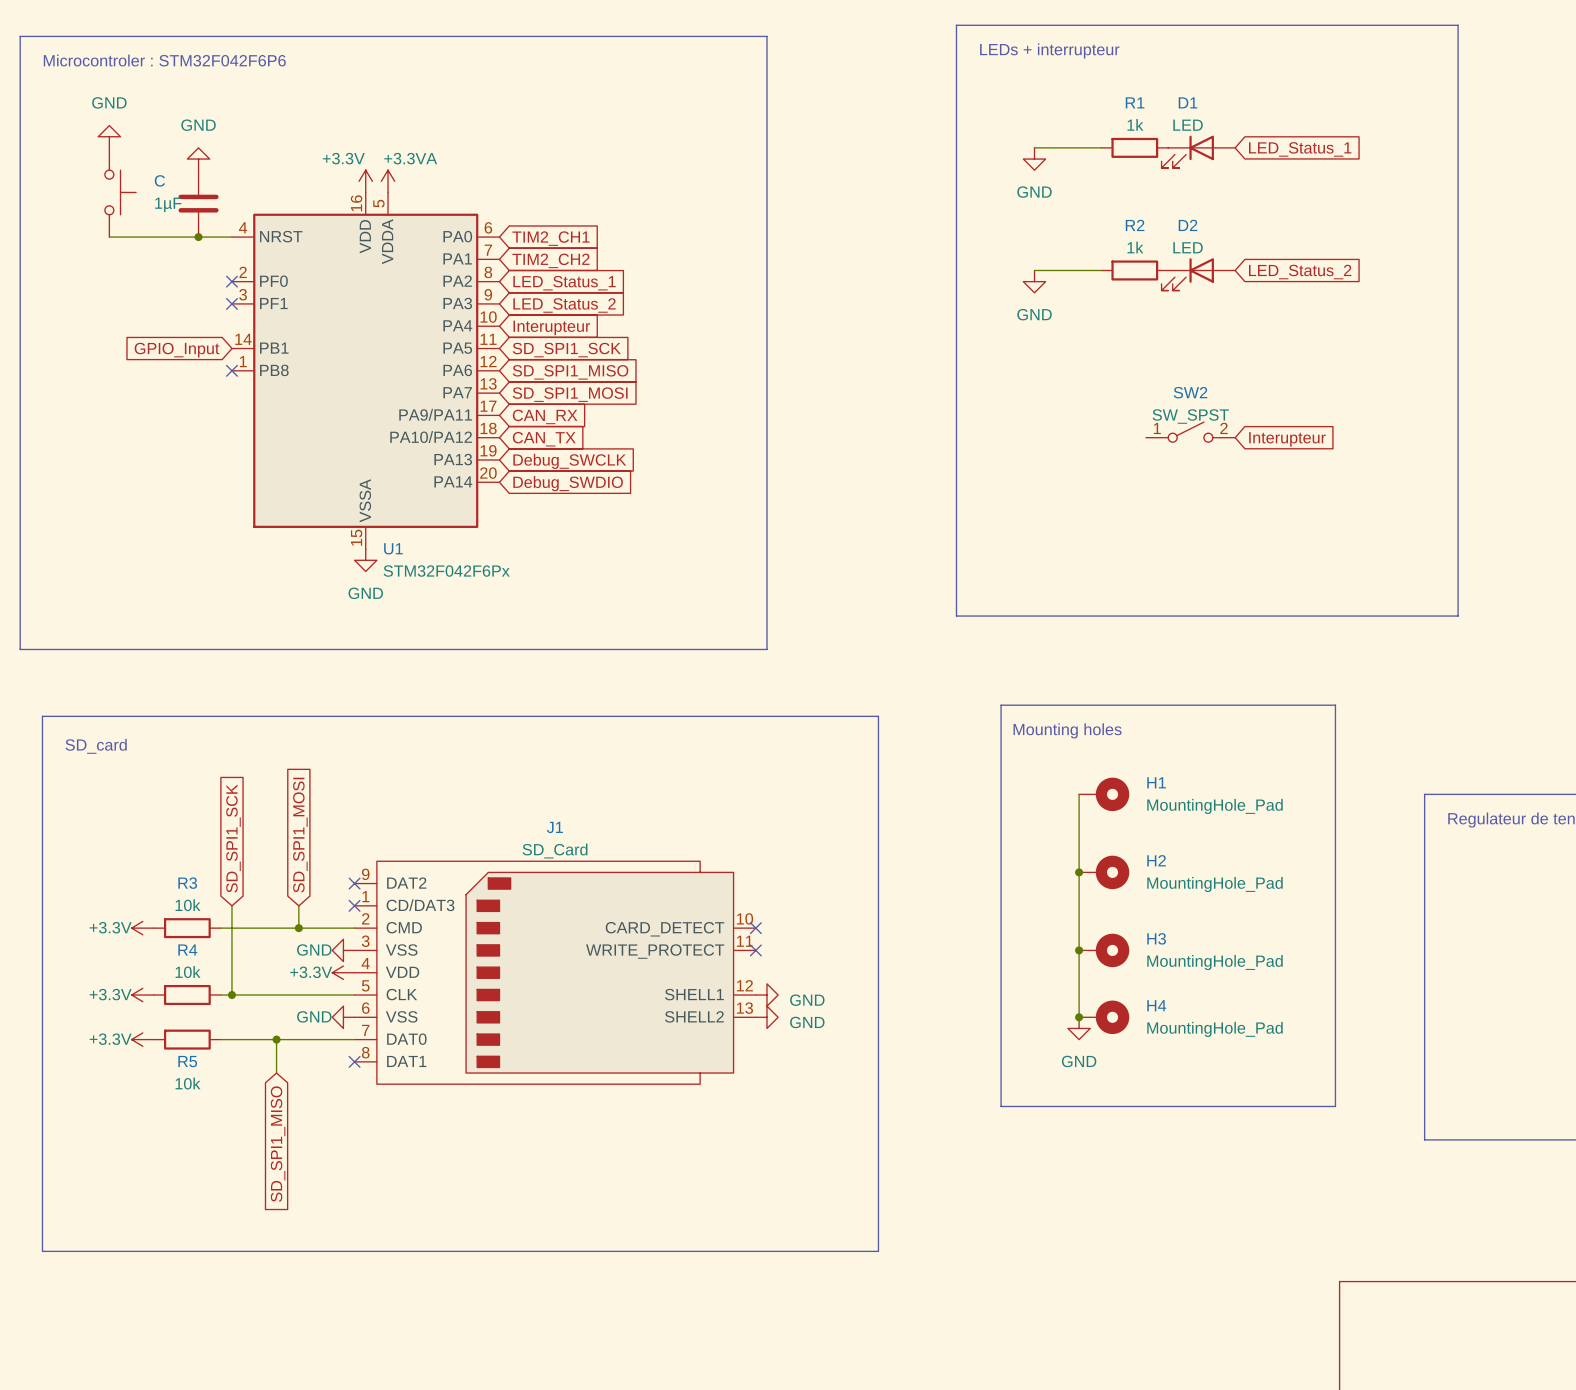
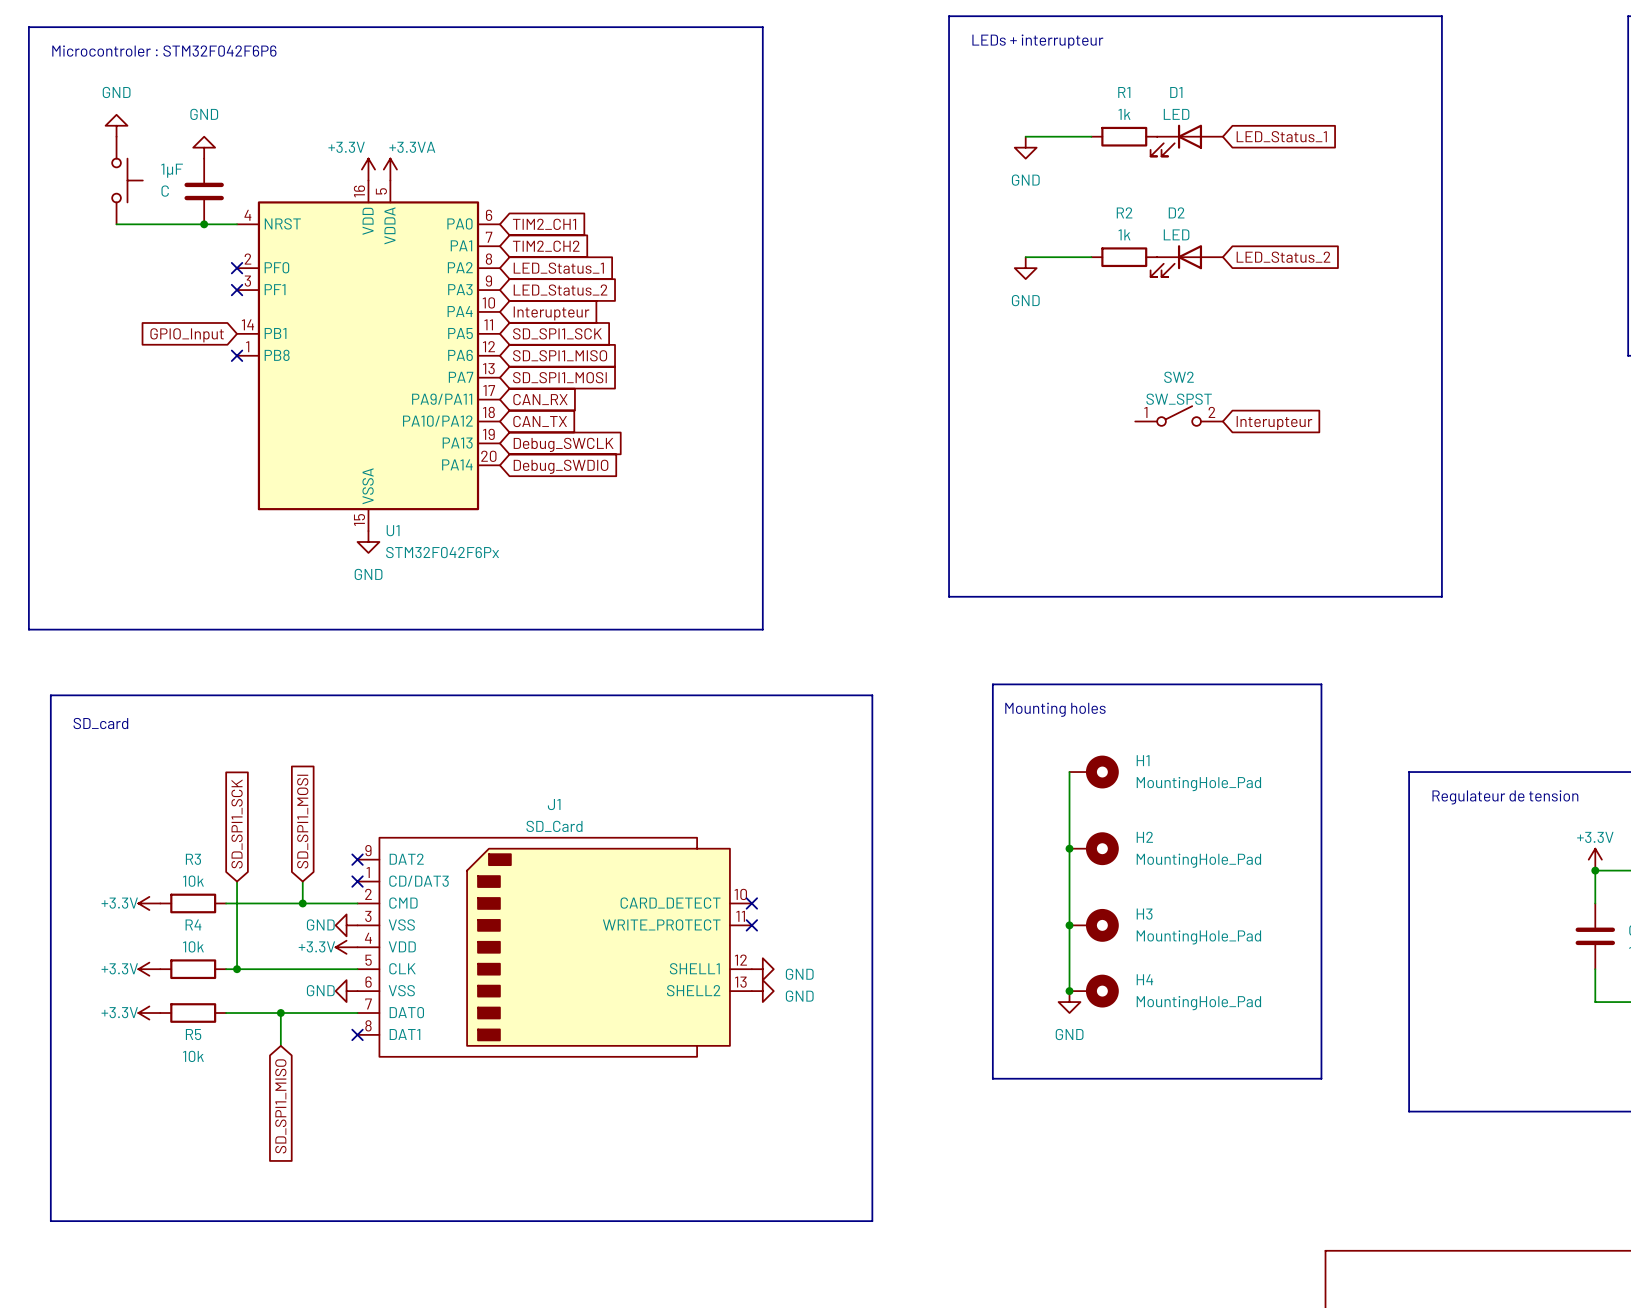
C name: C (159, 180) -> 1µF (172, 170)
C value: 1µF (168, 204) -> C (165, 191)

